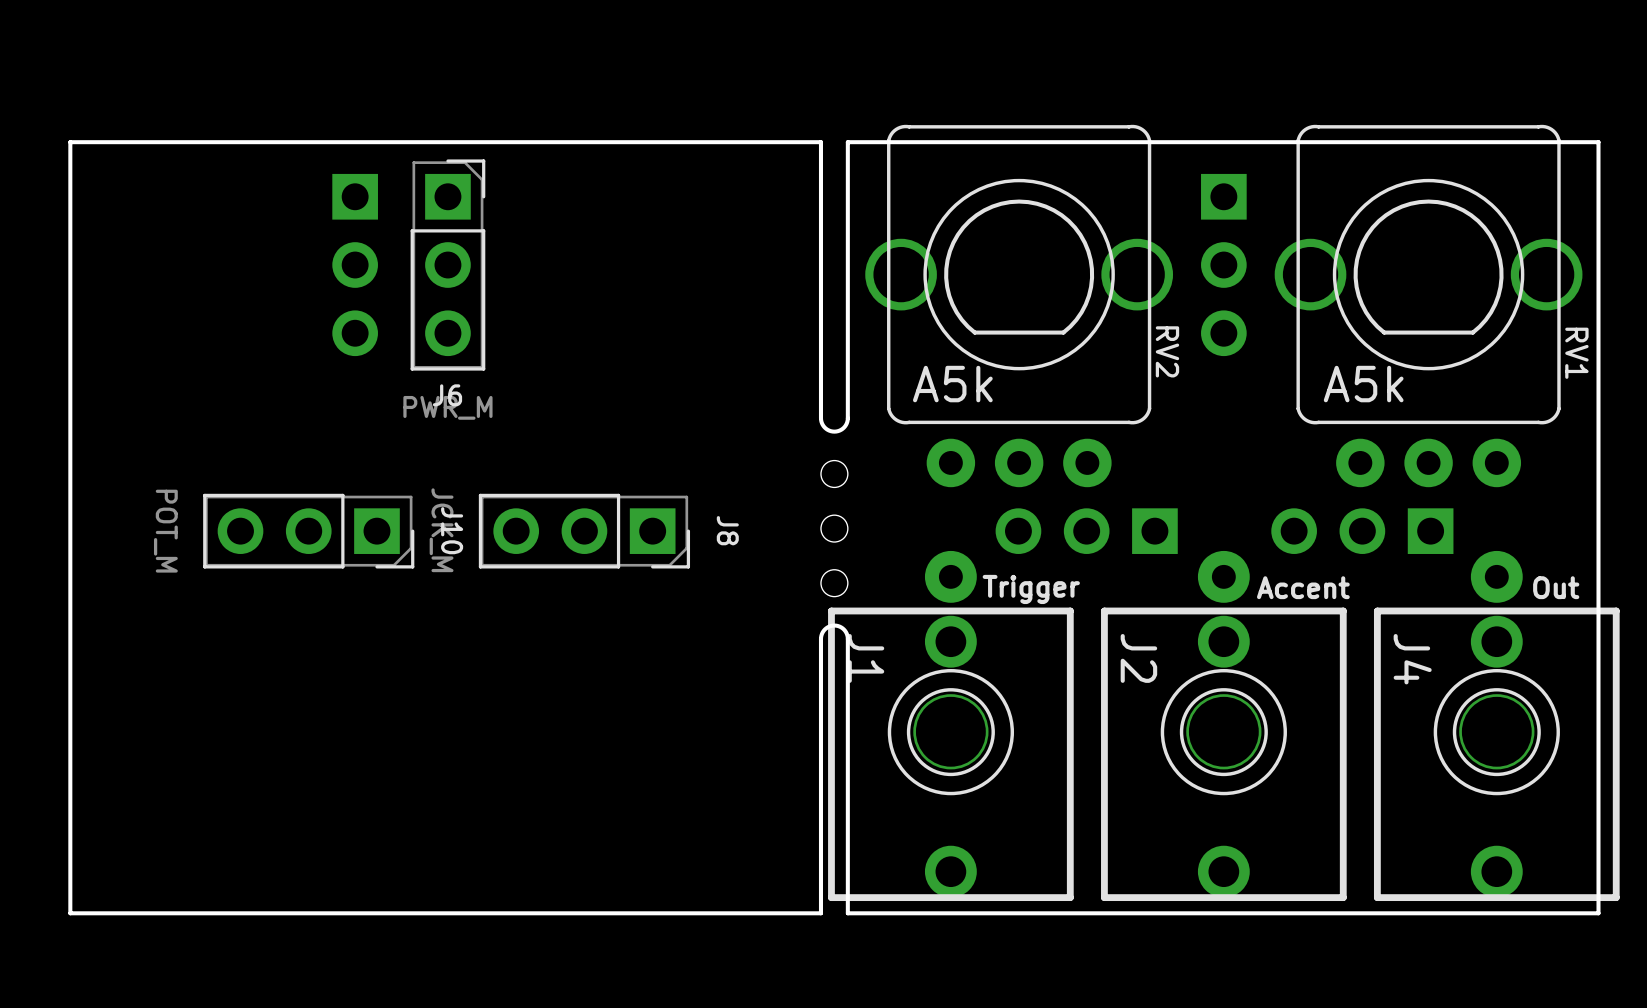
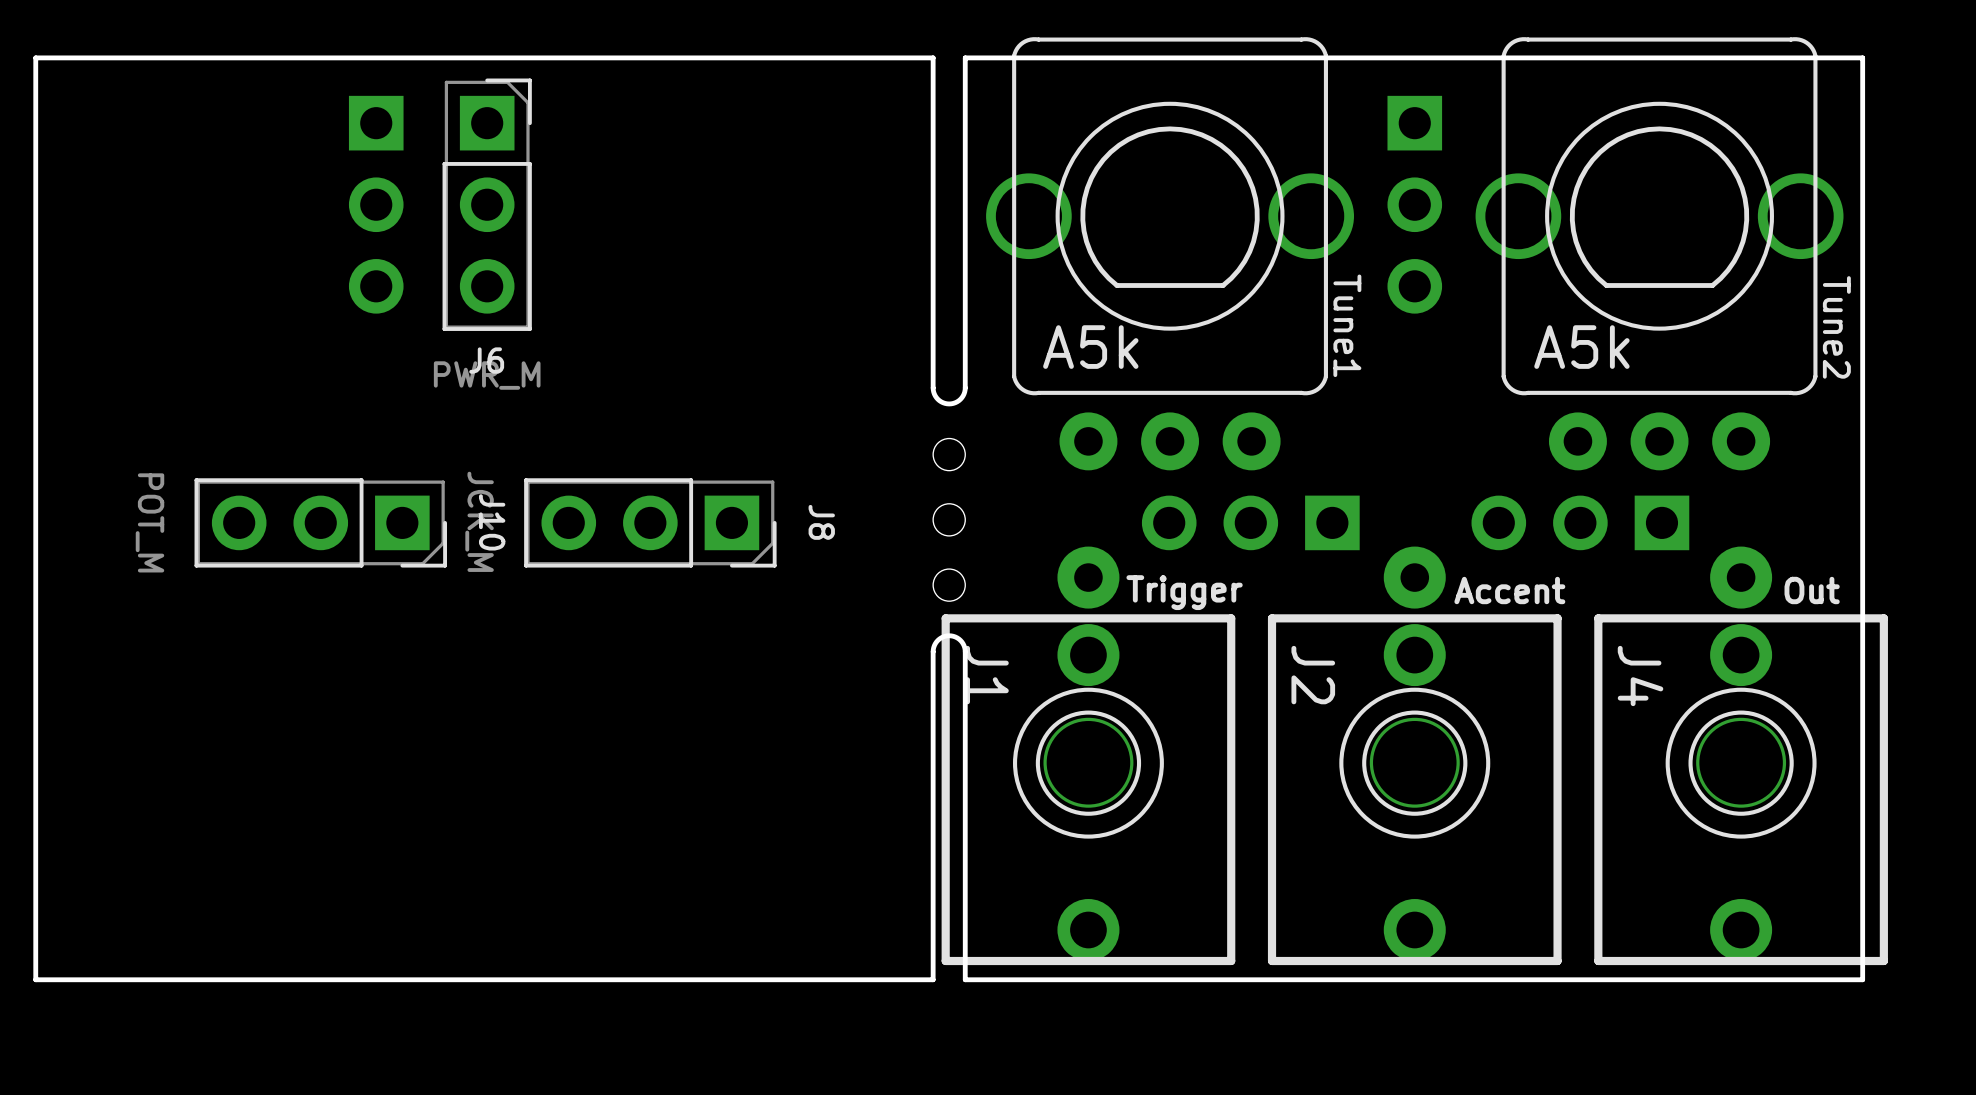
RV2 name: RV2 (1167, 351) -> Tune1 (1347, 325)
RV1 name: RV1 (1576, 353) -> Tune2 (1836, 327)

